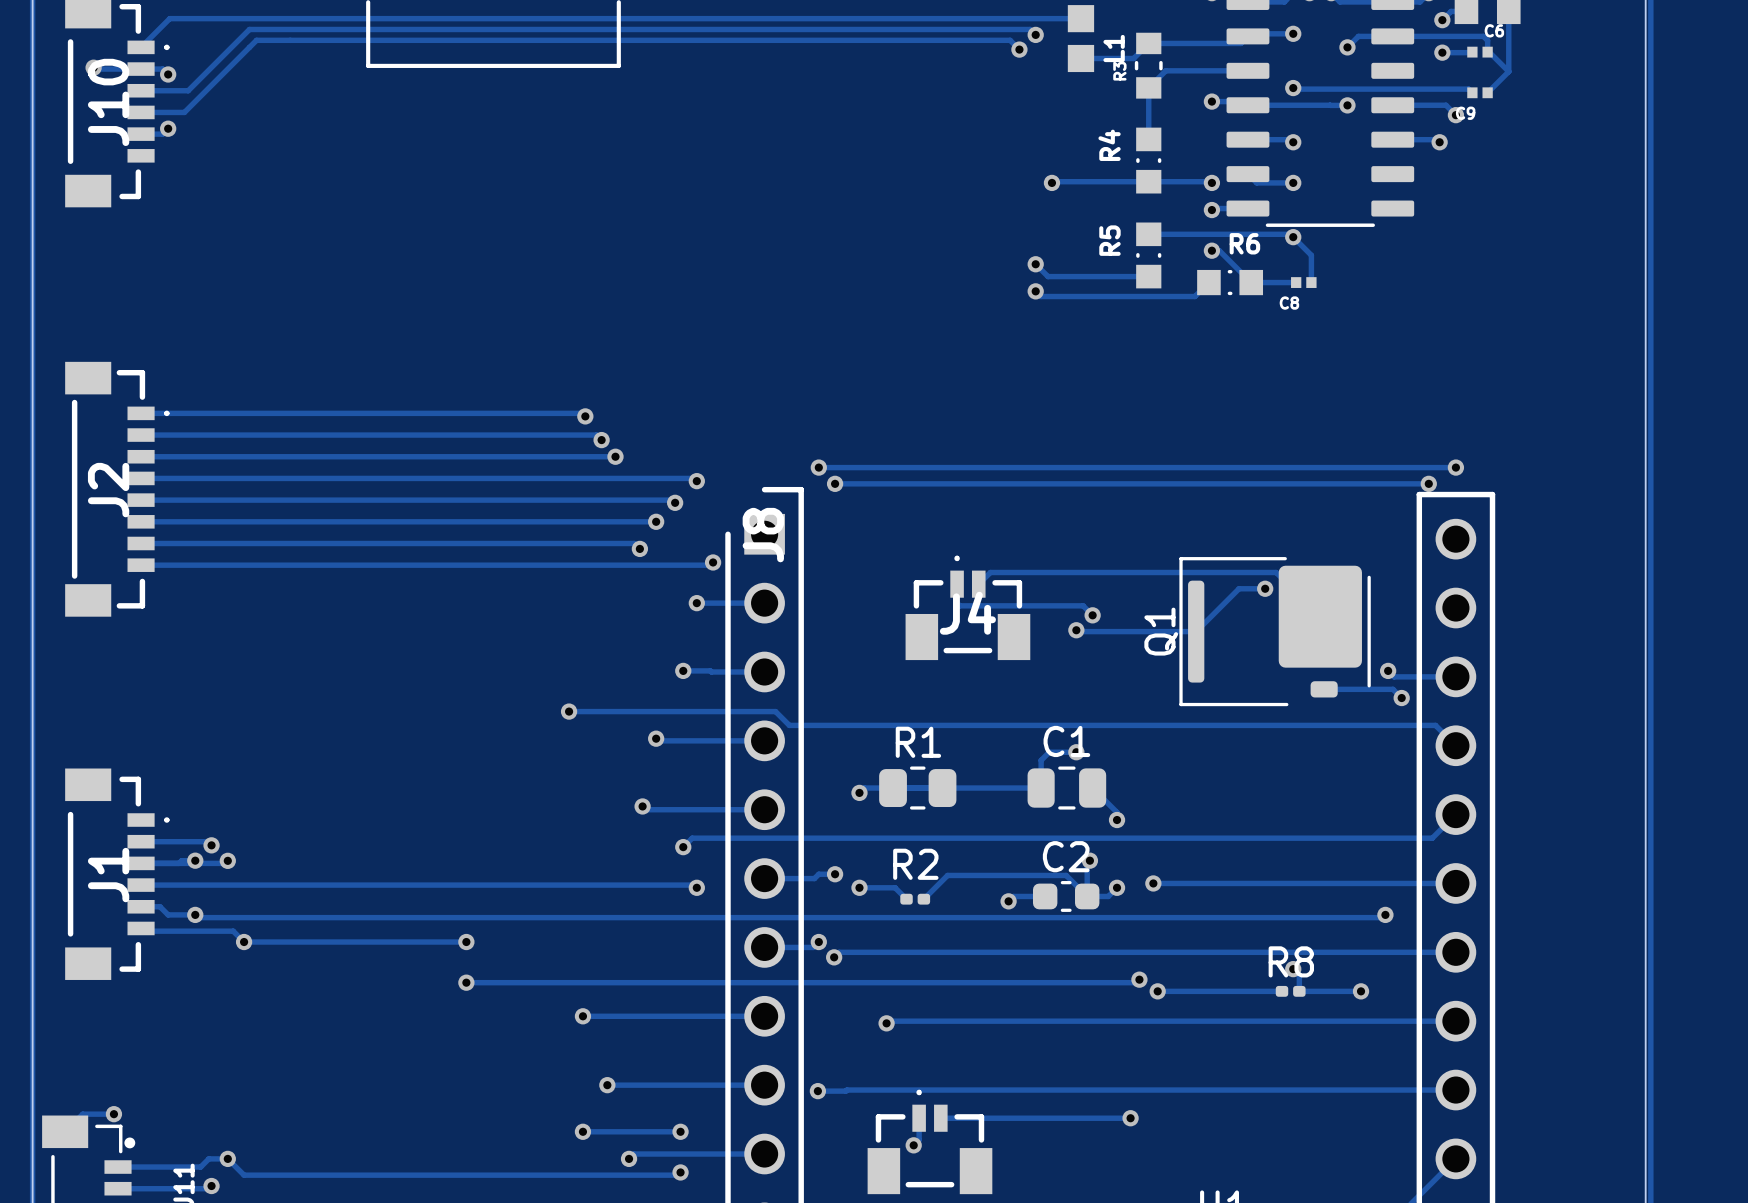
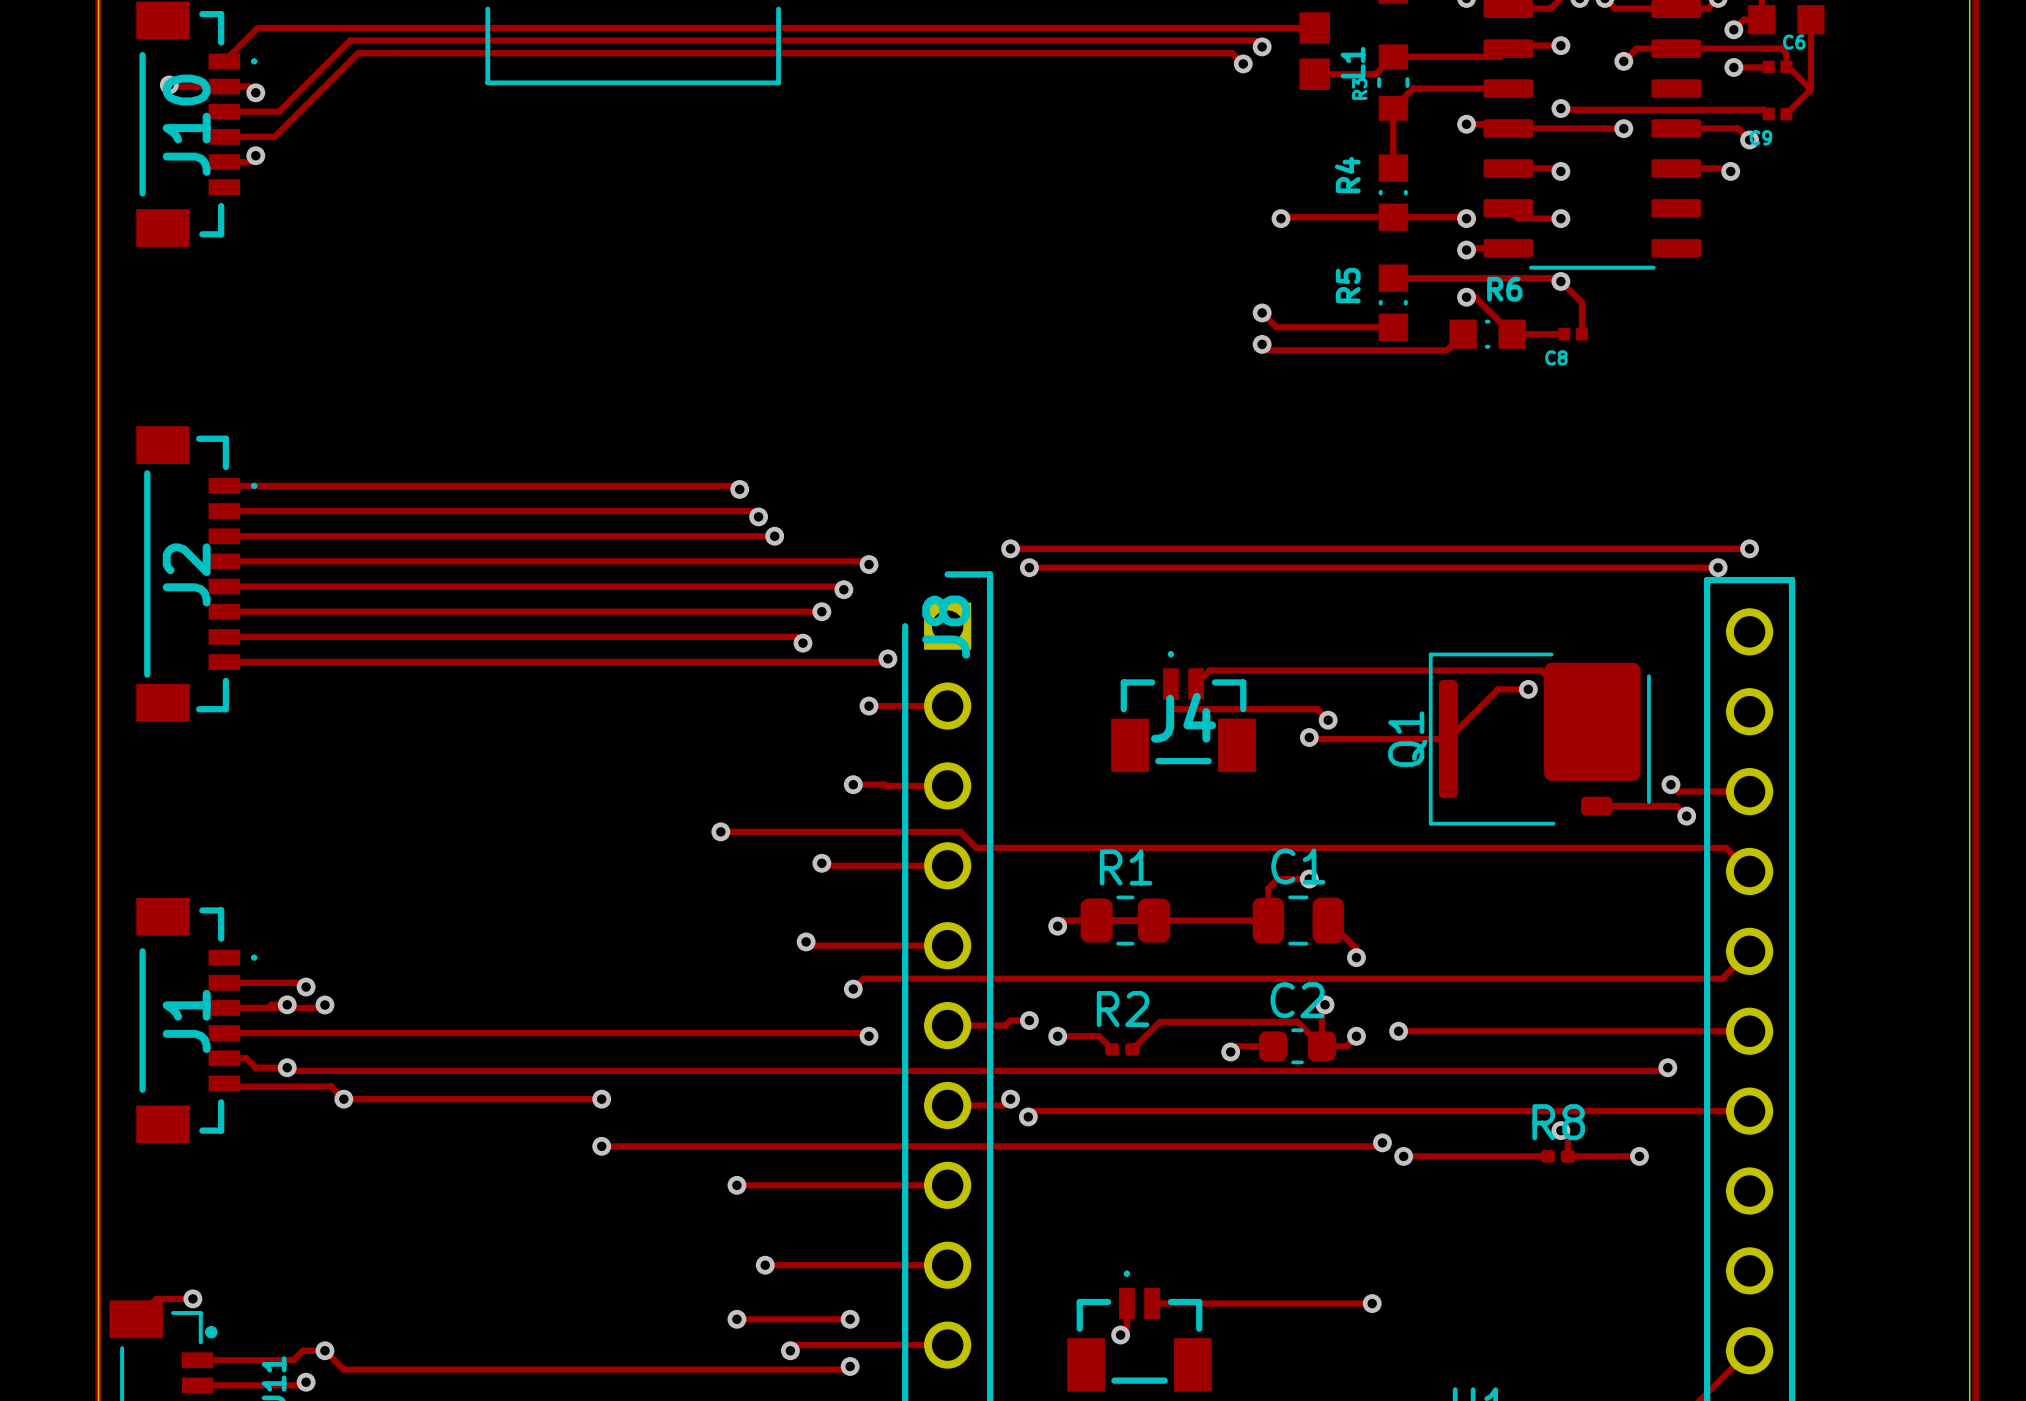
track: (1455, 1021) (888, 1021) (886, 1023) -> none
via: (886, 1023) -> none
track: (1455, 1090) (817, 1091) -> none
via: (817, 1091) -> none

